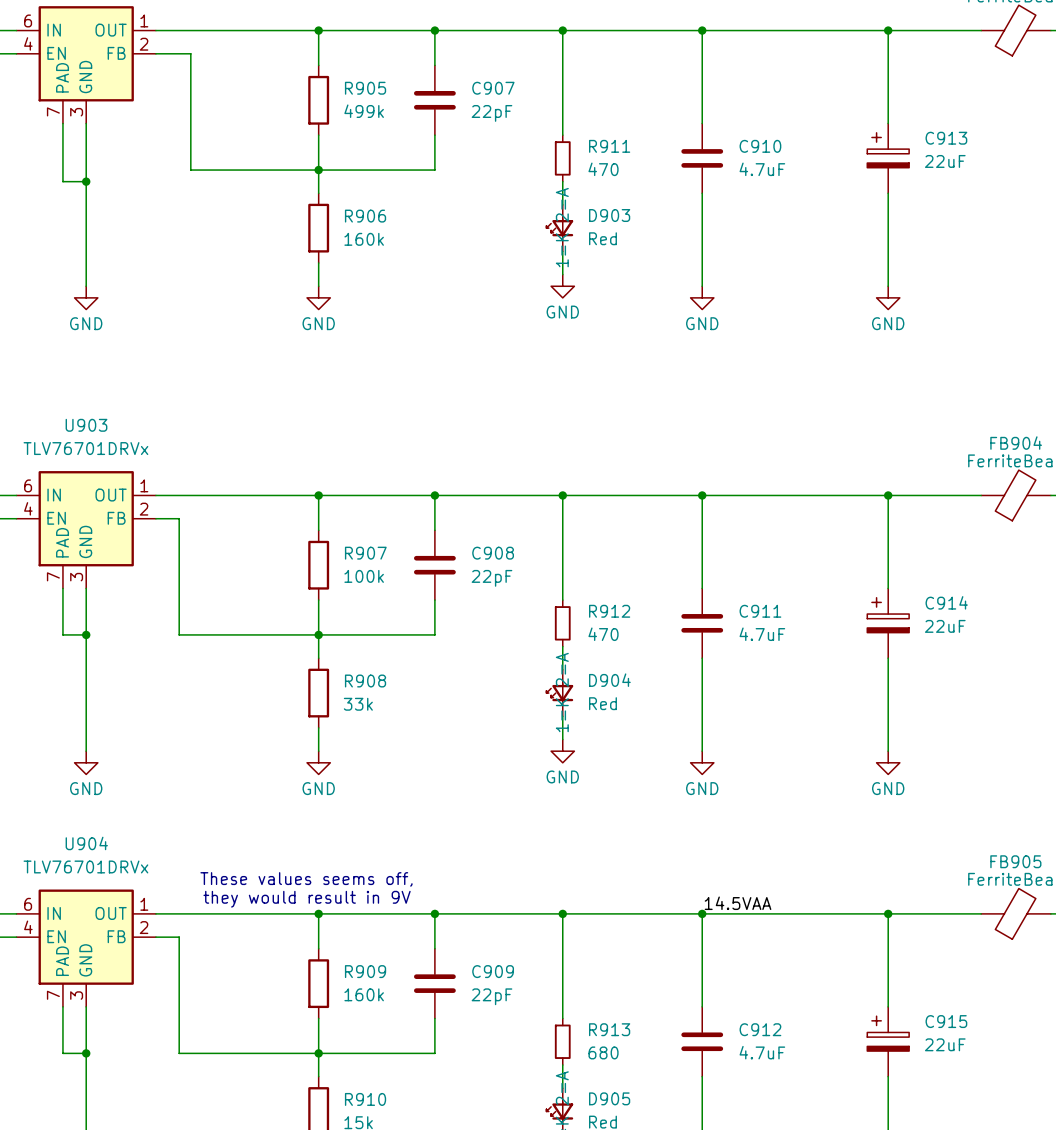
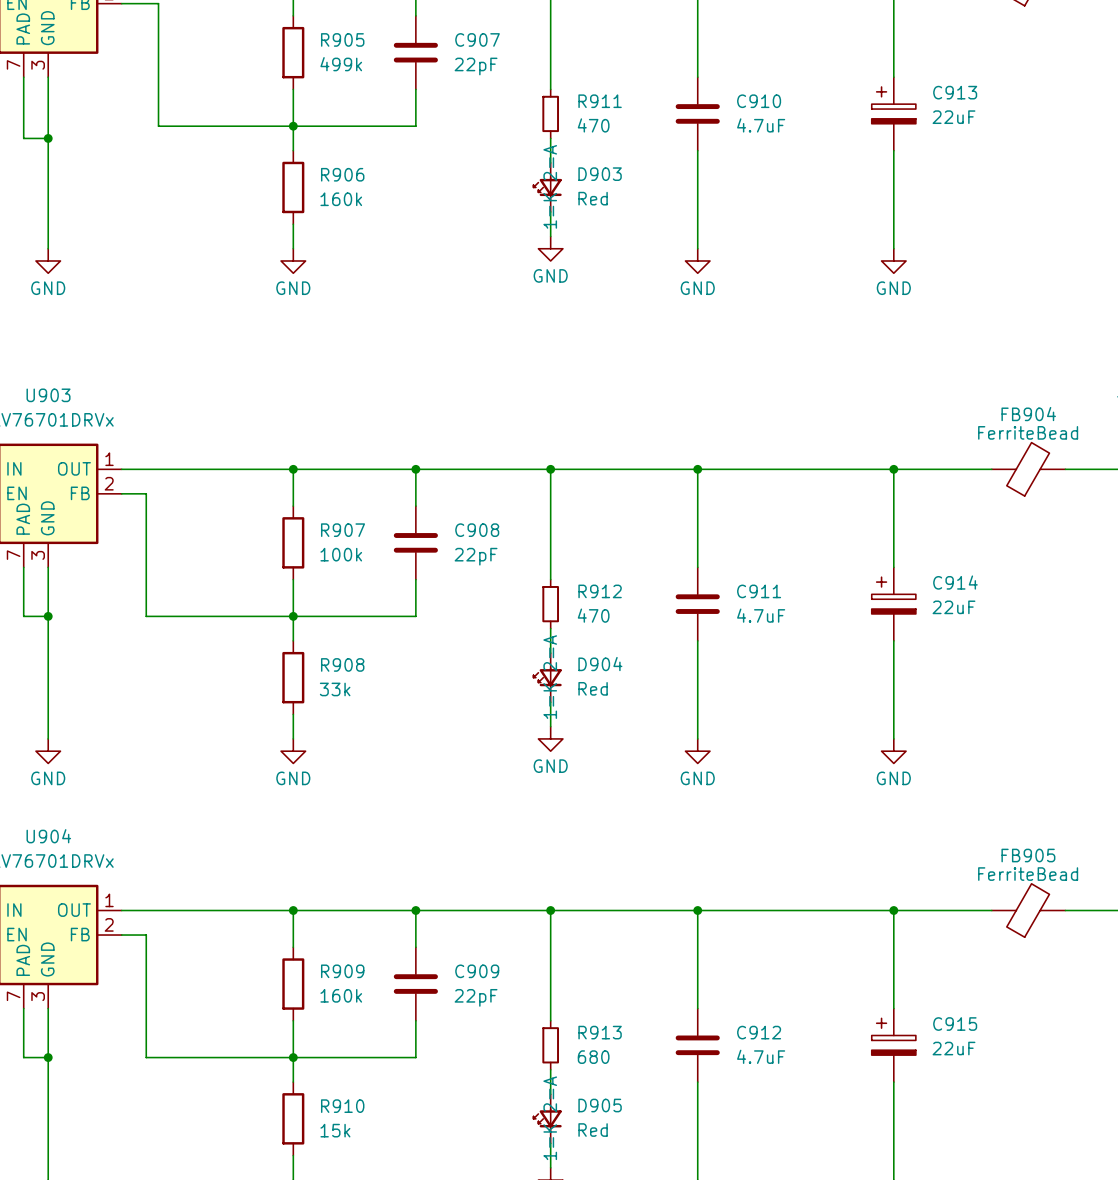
text: These values seems off, (306, 879) -> none
text: they would result in 9V (307, 899) -> none
label: 14.5VAA (738, 903) -> none

